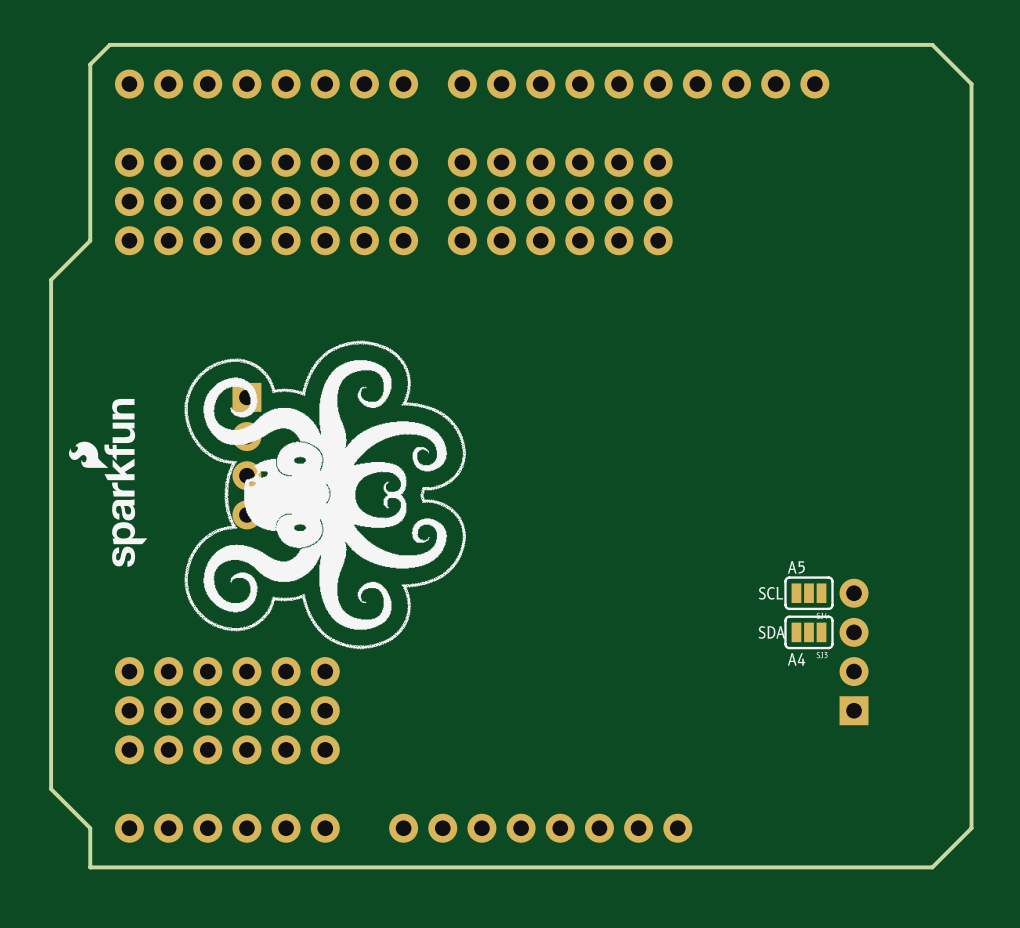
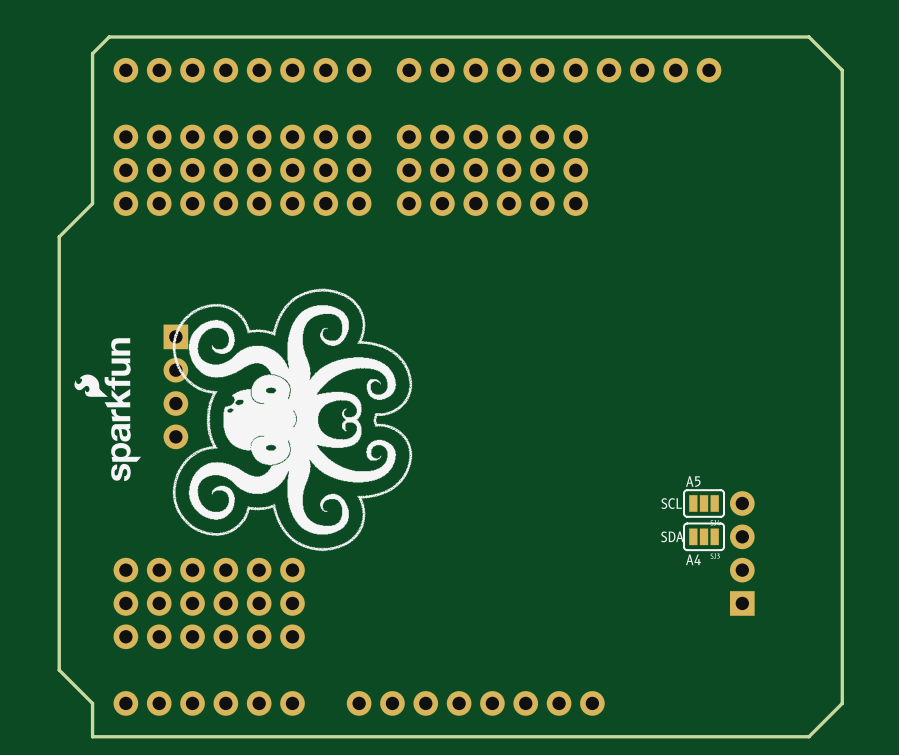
part position: (246, 456) -> (175, 386)

